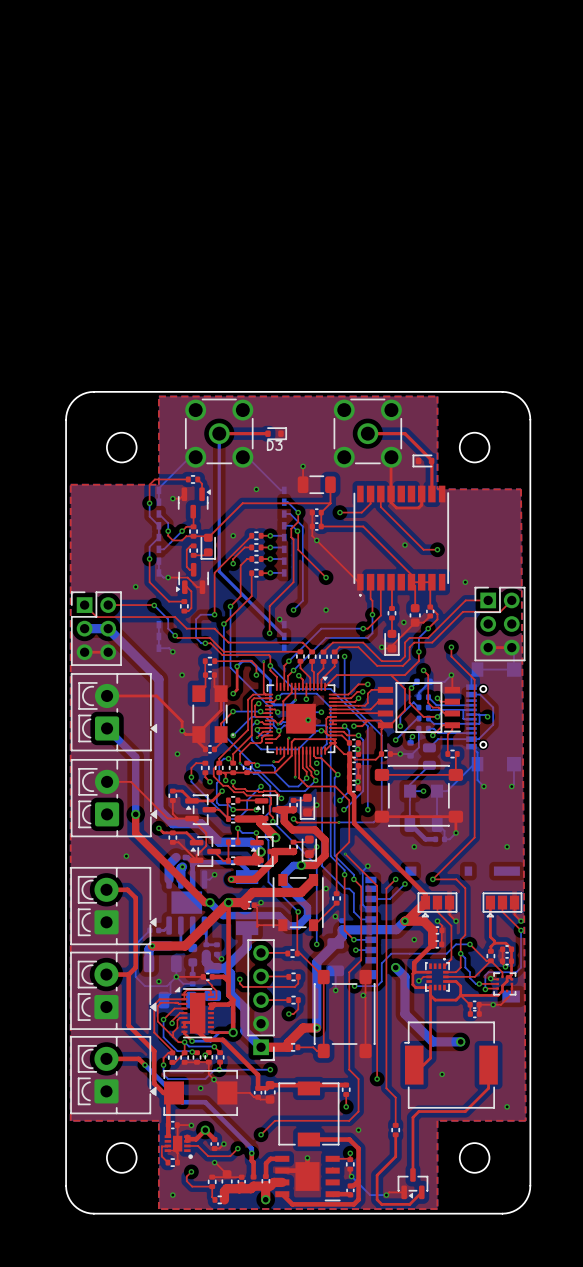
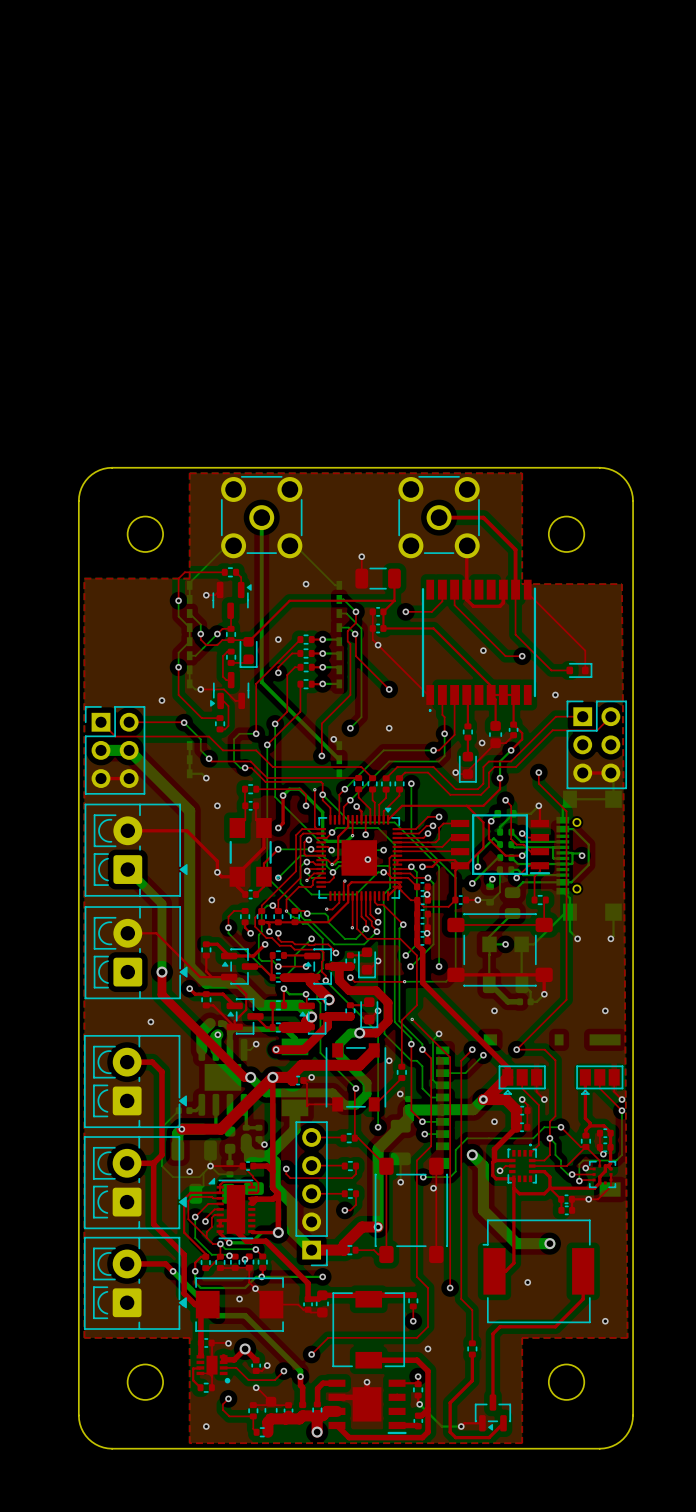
top track: (219, 433) (267, 433) -> none
D3: (275, 433) -> none
part rotation: 0° (423, 460) -> 180° (579, 670)
part position: (423, 460) -> (579, 670)
top track: none -> (515, 589) (515, 634) (551, 670) (571, 668)
top track: none -> (527, 589) (527, 593) (585, 650) (585, 670)

